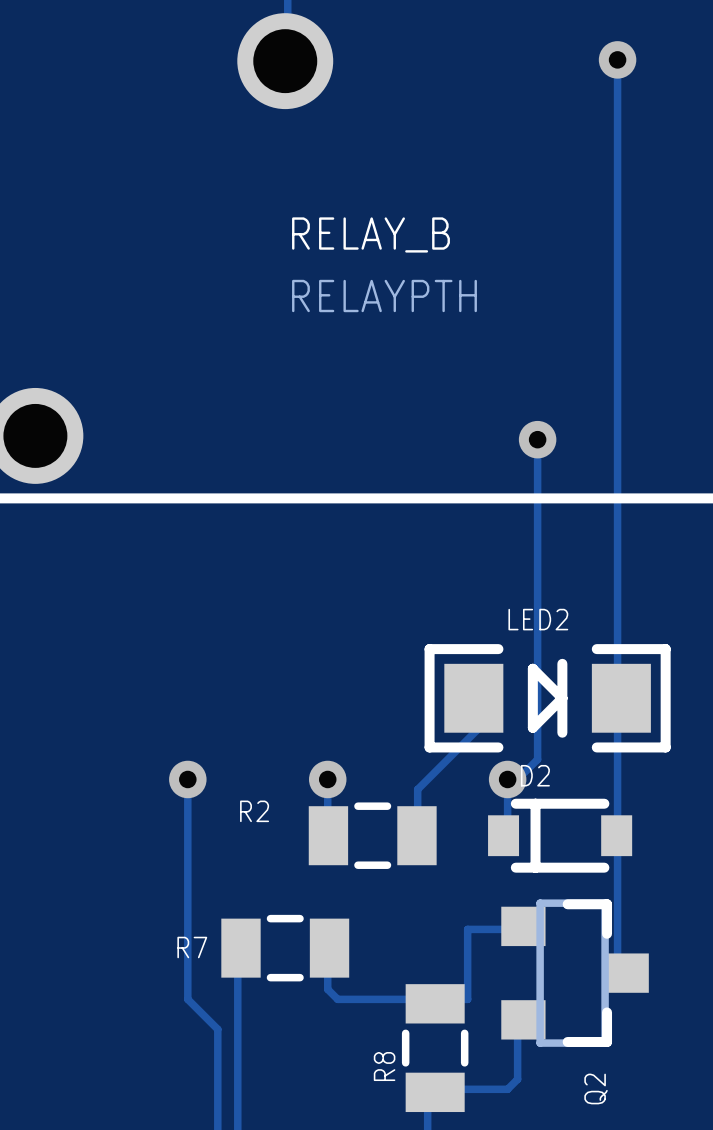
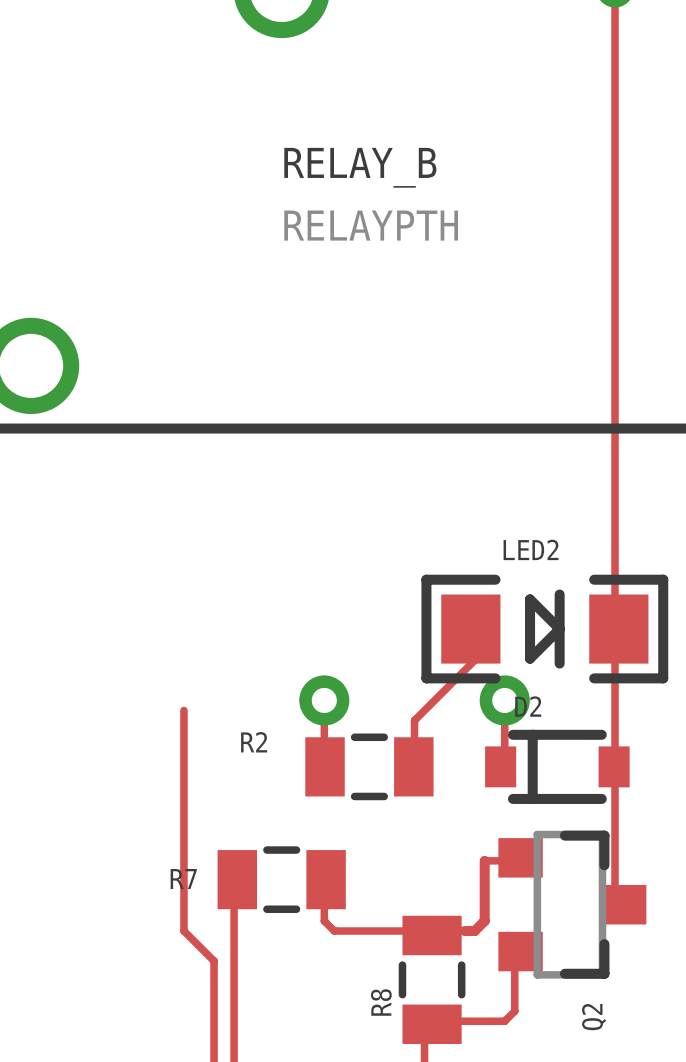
track: (537, 439) (537, 759) (507, 789) -> none
via: (537, 439) -> none
via size: [308, 760, 347, 799] -> [299, 675, 350, 726]
via size: [488, 760, 527, 799] -> [479, 675, 530, 726]
via: (187, 779) -> none
track: (487, 929) (467, 929) (467, 999) -> (484, 860) (484, 920) (474, 931) (464, 931)

